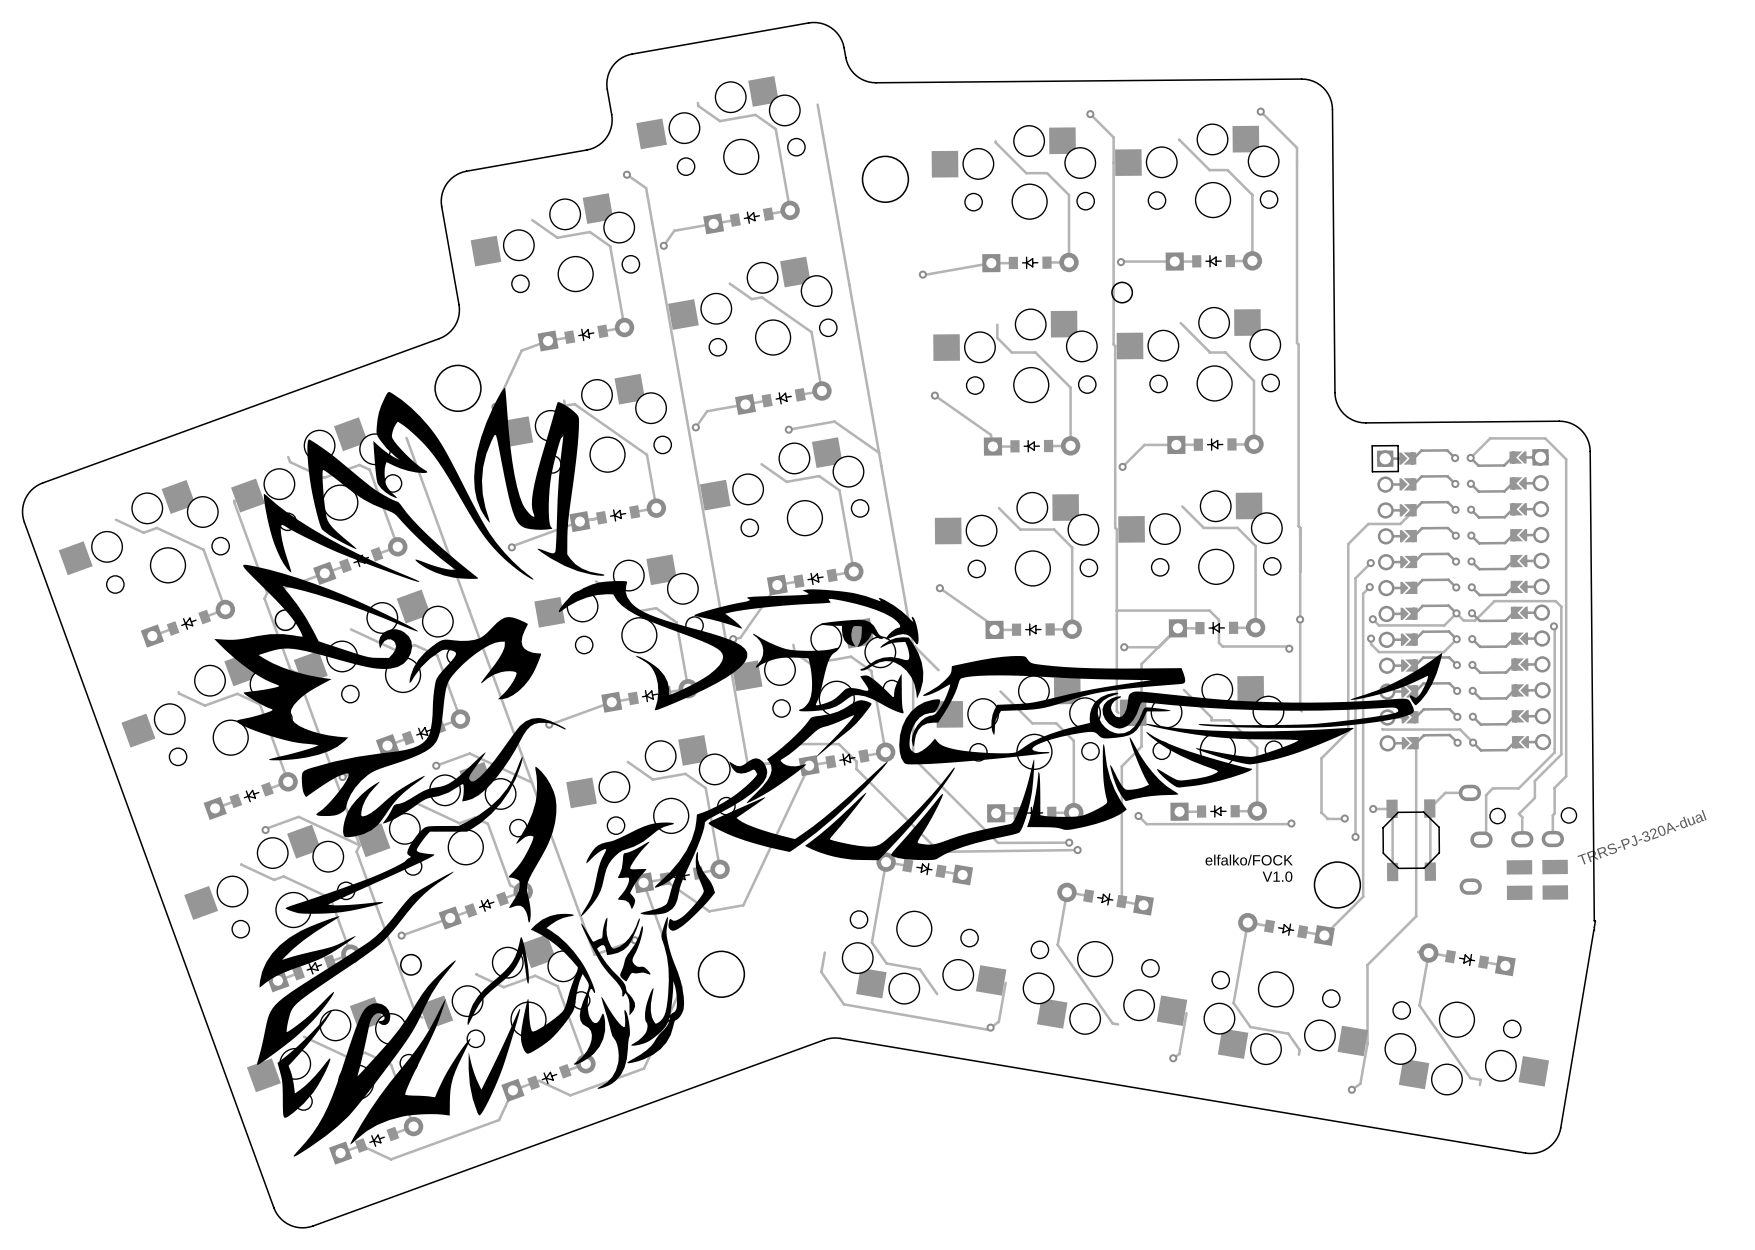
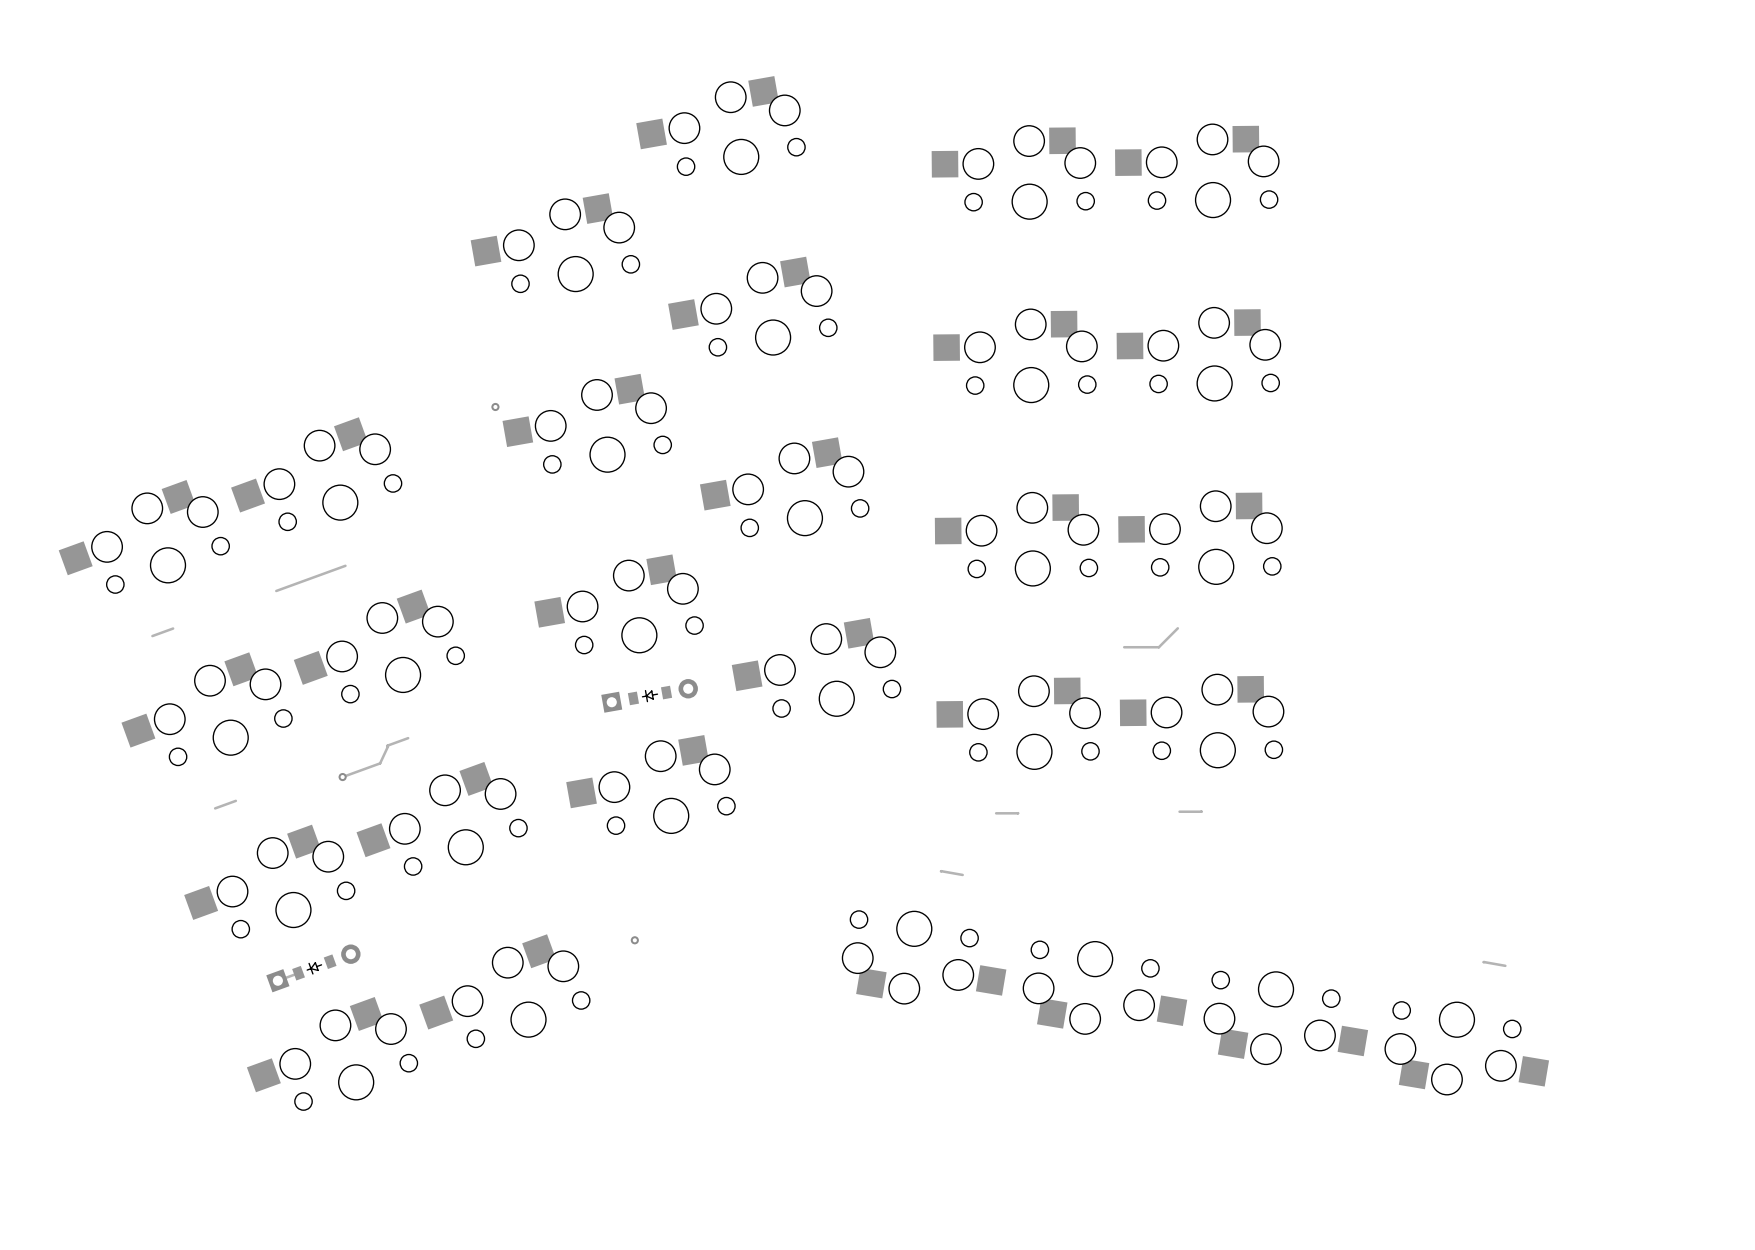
board edge: (808, 22) (625, 56) (614, 63) (607, 75) (606, 86) (611, 124) (606, 137) (599, 144) (586, 149) (466, 171) (451, 178) (443, 189) (441, 203) (459, 311) (455, 325) (445, 335) (42, 483) (33, 488) (25, 498) (22, 512) (24, 522) (276, 1213) (283, 1221) (292, 1226) (302, 1227) (313, 1226) (832, 1038) (1525, 1153) (1539, 1152) (1548, 1147) (1557, 1137) (1560, 1127) (1595, 920) (1590, 451) (1585, 435) (1575, 425) (1562, 421) (1365, 422) (1352, 419) (1341, 411) (1336, 402) (1334, 392) (1332, 105) (1326, 90) (1316, 83) (1301, 79) (872, 82) (862, 79) (851, 70) (846, 61) (841, 40) (834, 30) (820, 23) (808, 22) -> none
track: (697, 103) (698, 106) (720, 121) (755, 114) (775, 129) (790, 210) (768, 214) -> none
track: (817, 104) (879, 452) -> none
track: (1260, 111) (1297, 147) (1297, 342) (1298, 344) (1298, 526) (1300, 527) (1300, 709) (1301, 711) -> none
via: (1260, 111) -> none
track: (1090, 114) (1113, 137) (1113, 344) (1115, 346) (1115, 527) (1116, 529) (1116, 711) (1118, 712) -> none
via: (1090, 114) -> none
track: (1179, 139) (1209, 170) (1227, 170) (1252, 194) (1252, 260) (1230, 261) -> none
track: (995, 141) (1026, 173) (1047, 173) (1068, 195) (1068, 262) (1046, 262) -> none
round board edge: [861, 155, 910, 203] -> none
track: (626, 174) (646, 188) (747, 763) (768, 763) (788, 744) (838, 744) (856, 761) (856, 769) (939, 851) (1077, 850) -> none
via: (626, 174) -> none
part: (751, 217) -> none
track: (532, 220) (557, 237) (589, 232) (610, 246) (624, 327) (602, 331) -> none
track: (735, 220) (674, 230) (663, 245) -> none
via: (663, 245) -> none
part: (1213, 260) -> none
track: (1196, 261) (1121, 262) -> none
track: (1013, 262) (991, 263) (922, 274) -> none
part: (1030, 262) -> none
via: (1121, 262) -> none
via: (922, 274) -> none
round board edge: [1111, 281, 1134, 304] -> none
track: (729, 283) (751, 299) (761, 297) (811, 332) (821, 390) (800, 394) -> none
track: (1180, 323) (1209, 352) (1225, 352) (1253, 380) (1253, 444) (1231, 444) -> none
track: (997, 324) (997, 337) (1011, 352) (1035, 352) (1070, 387) (1070, 445) (1048, 446) -> none
part: (585, 334) -> none
track: (569, 337) (548, 341) (521, 350) (495, 406) -> none
round board edge: [434, 364, 482, 413] -> none
drawing: [214, 387, 1443, 1157] -> none
track: (934, 395) (990, 434) (992, 446) (1014, 446) -> none
via: (934, 395) -> none
part: (783, 398) -> none
track: (564, 400) (565, 405) (574, 404) (646, 454) (656, 508) (634, 511) -> none
track: (767, 400) (707, 411) (695, 427) -> none
via: (695, 427) -> none
track: (788, 429) (834, 421) (879, 452) -> none
via: (788, 429) -> none
track: (406, 437) (594, 954) (634, 940) -> none
track: (1198, 444) (1144, 444) (1122, 466) -> none
part: (1215, 444) -> none
part: (1032, 445) -> none
track: (879, 452) (913, 646) -> none
track: (288, 457) (290, 462) (324, 477) (359, 465) (369, 469) (397, 546) (377, 554) -> none
track: (1470, 457) (1490, 438) (1545, 438) (1566, 459) (1566, 776) (1554, 788) (1552, 839) -> none
track: (761, 464) (786, 481) (819, 476) (839, 490) (853, 571) (832, 575) -> none
via: (1122, 466) -> none
track: (234, 500) (267, 592) (264, 598) (290, 669) (296, 672) (359, 845) -> none
track: (1182, 506) (1203, 527) (1237, 527) (1255, 545) (1255, 627) (1233, 627) -> none
track: (998, 508) (1020, 529) (1054, 529) (1072, 547) (1072, 629) (1050, 629) -> none
track: (1414, 510) (1400, 523) (1368, 523) (1348, 544) (1348, 731) (1321, 758) (1321, 812) -> none
part: (617, 515) -> none
track: (601, 517) (579, 521) (511, 547) -> none
track: (115, 519) (143, 532) (156, 527) (203, 549) (225, 609) (204, 617) -> none
via: (511, 547) -> none
part: (360, 561) -> none
track: (1370, 563) (1355, 578) (1355, 837) -> none
via: (1370, 563) -> none
part: (815, 578) -> none
track: (595, 581) (638, 611) (656, 608) (676, 622) (688, 688) (666, 692) -> none
track: (799, 581) (777, 585) (740, 637) (733, 639) -> none
track: (1369, 587) (1363, 593) (1363, 896) (1324, 935) (1302, 931) -> none
via: (1369, 587) -> none
track: (939, 588) (993, 626) (994, 629) (1016, 629) -> none
via: (939, 588) -> none
part: (1461, 598) -> none
round board edge: [274, 609, 297, 632] -> none
track: (1116, 610) (1209, 610) (1218, 620) (1218, 642) (1222, 646) (1289, 646) (1289, 648) -> none
via: (1300, 619) -> none
track: (1372, 619) (1379, 625) (1444, 625) (1456, 613) (1463, 620) (1475, 620) (1494, 601) (1555, 601) (1561, 606) (1561, 754) (1534, 780) (1534, 797) (1518, 813) (1522, 817) (1522, 839) -> none
via: (1372, 619) -> none
part: (187, 623) -> none
track: (1553, 626) (1554, 752) (1518, 788) (1492, 788) (1486, 795) (1486, 835) (1481, 839) -> none
via: (1553, 626) -> none
part: (1217, 627) -> none
track: (1199, 628) (1177, 628) (1141, 664) (1141, 746) (1121, 766) (1121, 901) (1143, 905) -> none
track: (350, 629) (397, 651) (414, 645) (437, 655) (460, 719) (439, 726) -> none
part: (1033, 629) -> none
track: (1371, 638) (1371, 644) (1378, 652) (1443, 652) (1456, 639) -> none
via: (1371, 638) -> none
via: (733, 639) -> none
track: (793, 644) (794, 652) (810, 663) (850, 656) (871, 670) (885, 752) (863, 756) -> none
track: (913, 646) (938, 670) -> none
track: (913, 646) (913, 757) (998, 842) (1069, 842) -> none
via: (1124, 647) -> none
via: (1289, 648) -> none
track: (1183, 689) (1211, 717) (1211, 720) (1229, 720) (1257, 747) (1257, 811) (1235, 811) -> none
track: (1000, 691) (1032, 723) (1056, 723) (1073, 740) (1073, 812) (1051, 812) -> none
track: (178, 692) (205, 705) (237, 693) (259, 704) (288, 781) (267, 789) -> none
track: (633, 698) (611, 702) (549, 724) -> none
via: (549, 724) -> none
track: (1382, 729) (1460, 729) (1473, 742) -> none
part: (423, 733) -> none
track: (1416, 743) (1416, 916) (1367, 964) (1367, 1043) -> none
part: (847, 759) -> none
track: (627, 761) (652, 779) (685, 773) (705, 788) (720, 869) (698, 873) -> none
track: (831, 763) (830, 761) (809, 765) (743, 905) (709, 911) (665, 879) (643, 882) (681, 987) (644, 1068) (570, 1095) (539, 1080) (512, 1090) (499, 1120) (391, 1159) (361, 1145) (340, 1153) -> none
track: (436, 765) (469, 753) (531, 782) -> none
via: (436, 765) -> none
track: (1469, 792) (1445, 792) (1429, 808) (1430, 871) -> none
part: (250, 796) -> none
track: (413, 801) (459, 823) (474, 817) (487, 823) (510, 885) (523, 891) (502, 898) -> none
track: (1373, 809) (1392, 809) (1392, 872) -> none
via: (1373, 809) -> none
part: (1218, 811) -> none
part: (1035, 812) -> none
track: (1321, 812) (1327, 818) (1344, 818) -> none
track: (1138, 815) (1146, 824) (1291, 823) -> none
via: (1138, 815) -> none
via: (1344, 818) -> none
via: (1291, 823) -> none
track: (265, 830) (298, 816) (359, 845) -> none
via: (265, 830) -> none
via: (1355, 837) -> none
part: TRRS-PJ-320A-dual (1517, 839) -> none
part: (1411, 840) -> none
via: (1069, 842) -> none
track: (359, 845) (356, 851) (416, 1014) (422, 1017) -> none
via: (1077, 850) -> none
text: elfalko/FOCK (1249, 860) -> none
round board edge: [1313, 861, 1362, 909] -> none
track: (241, 864) (274, 879) (283, 876) (330, 898) (350, 954) (330, 961) -> none
track: (907, 865) (886, 862) (871, 942) (886, 963) (919, 969) (937, 994) -> none
part: (1537, 867) -> none
part: (924, 868) -> none
part: (681, 876) -> none
text: V1.0 (1277, 876) -> none
part: (1537, 892) -> none
track: (1088, 896) (1066, 892) (1057, 944) (1112, 1023) (1118, 1024) -> none
part: (1105, 899) -> none
part: (485, 905) -> none
track: (470, 910) (401, 935) -> none
track: (1269, 926) (1247, 922) (1233, 1003) (1250, 1027) (1288, 1033) (1299, 1050) (1298, 1054) -> none
part: (1286, 929) -> none
via: (401, 935) -> none
round board edge: [697, 950, 746, 998] -> none
track: (824, 952) (821, 972) (843, 1004) (987, 1029) (998, 1021) (1005, 982) -> none
round board edge: [400, 953, 422, 976] -> none
track: (1450, 956) (1419, 951) (1418, 952) (1428, 953) (1419, 1005) (1470, 1078) (1480, 1079) (1479, 1085) -> none
part: (1467, 959) -> none
track: (476, 974) (503, 987) (535, 975) (557, 986) (585, 1063) (565, 1071) -> none
track: (1186, 1013) (1179, 1054) (1173, 1058) -> none
via: (990, 1027) -> none
track: (304, 1036) (350, 1058) (365, 1052) (391, 1064) (413, 1126) (392, 1134) -> none
track: (1367, 1043) (1360, 1083) (1351, 1089) -> none
via: (1173, 1058) -> none
part: (548, 1078) -> none
via: (1351, 1089) -> none
part: (376, 1140) -> none

